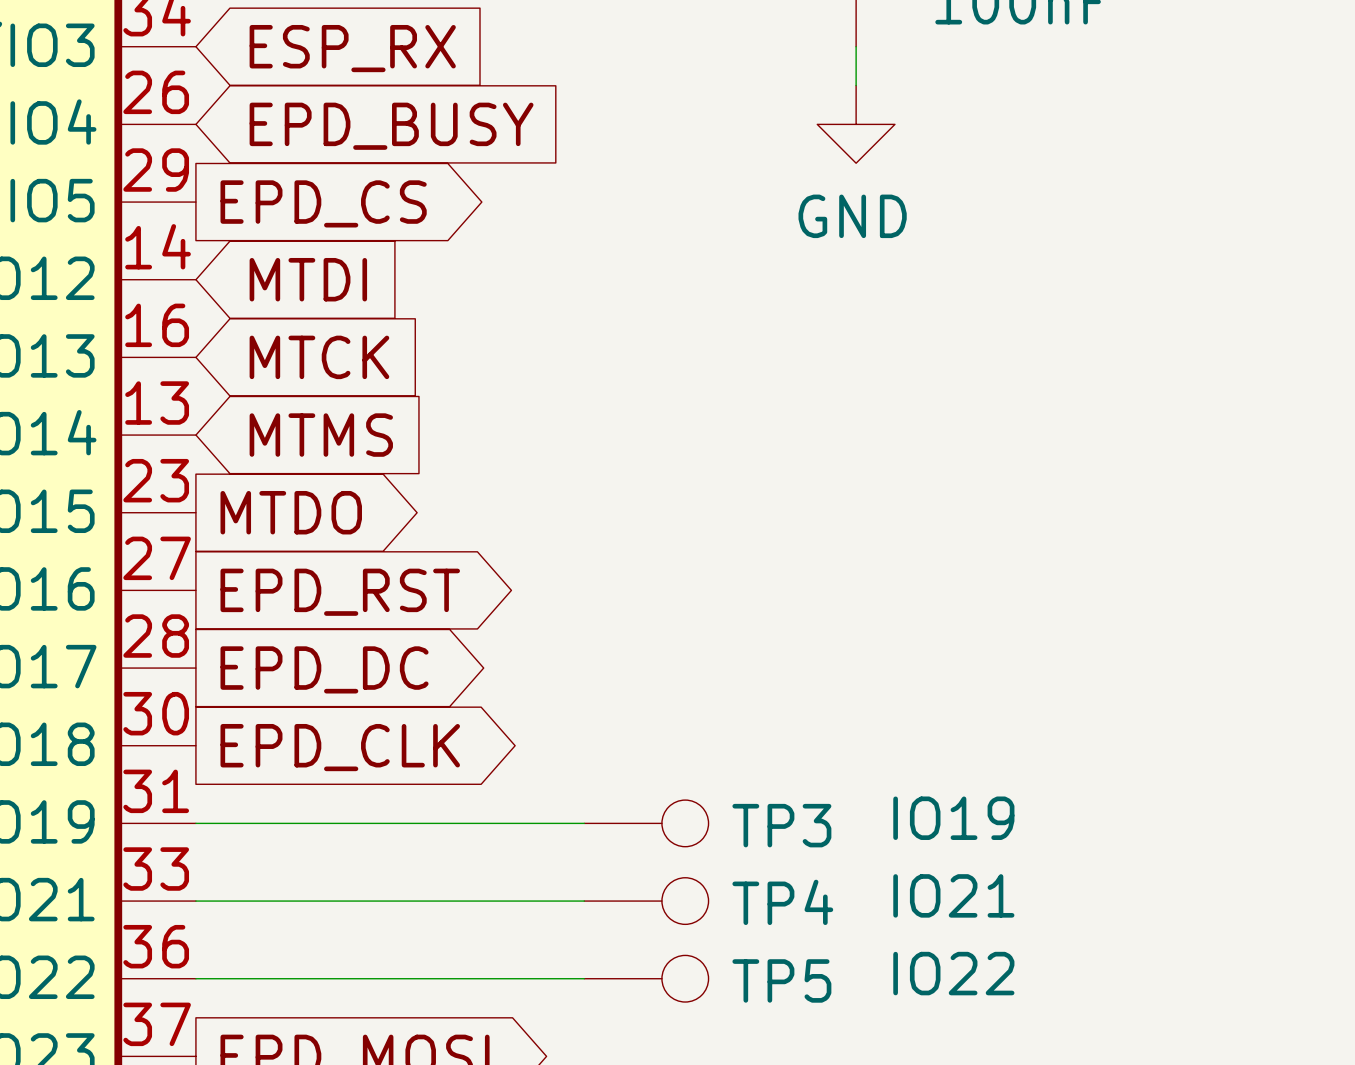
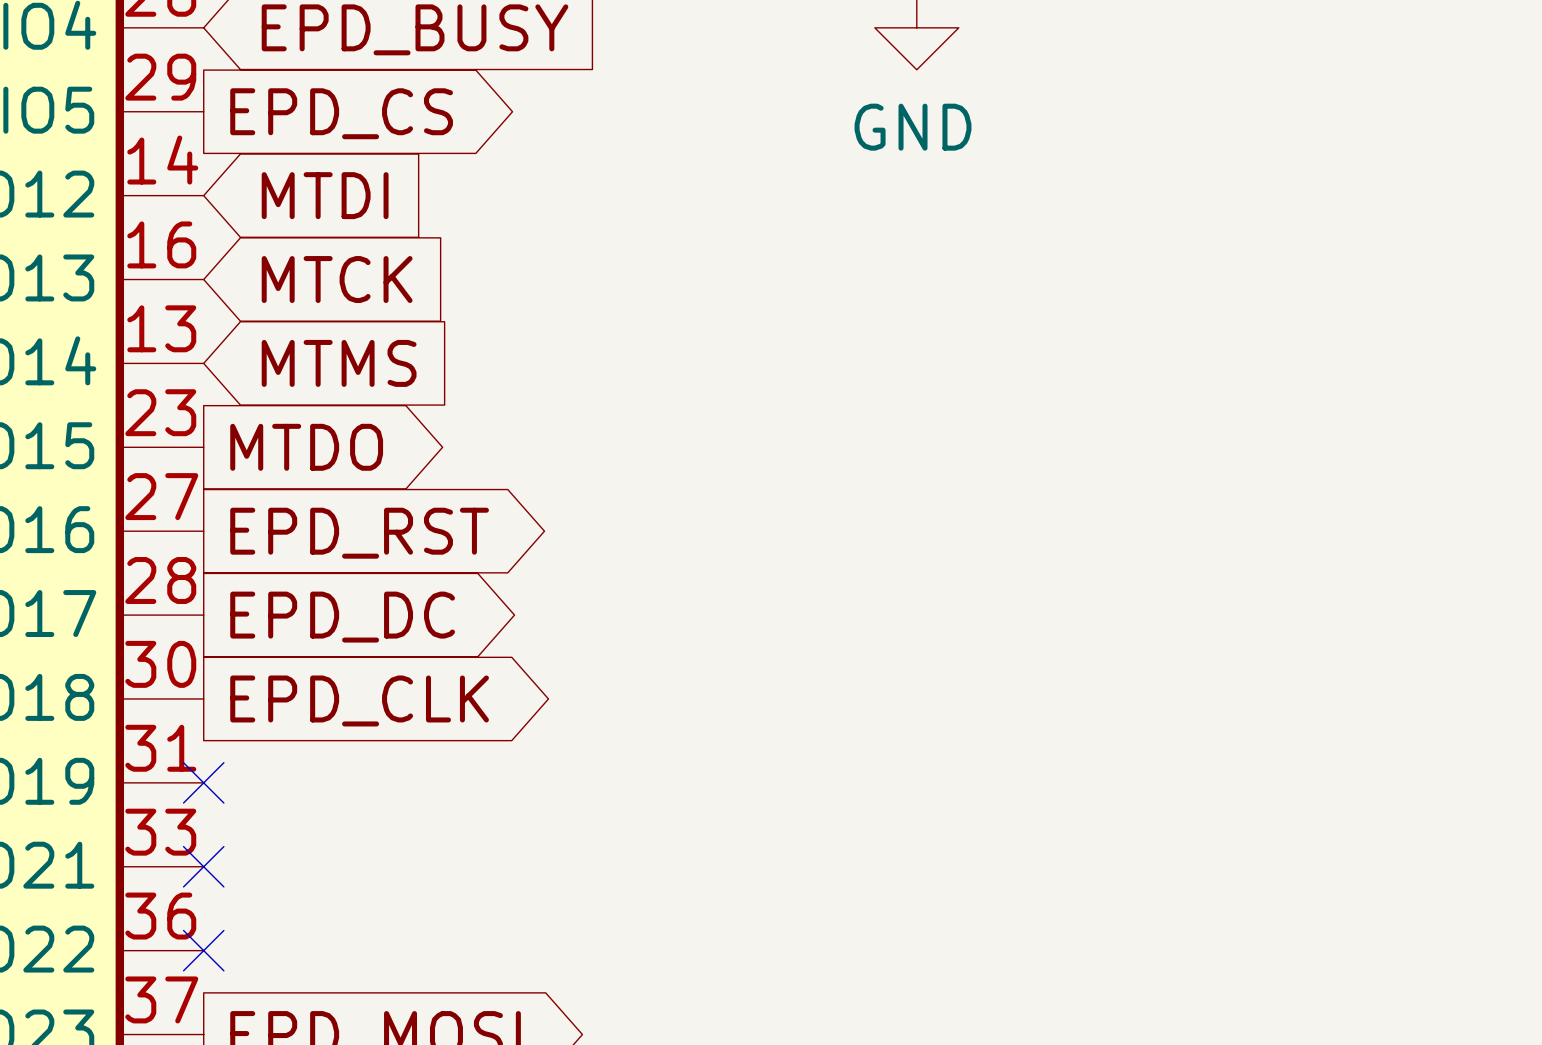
wire: (195, 823) (584, 823) -> none
no-connect mark: none -> (203, 782)
TP3: IO19 (646, 823) -> none
wire: (195, 901) (584, 901) -> none
no-connect mark: none -> (203, 866)
TP4: IO21 (646, 901) -> none
wire: (195, 978) (584, 978) -> none
no-connect mark: none -> (203, 950)
TP5: IO22 (646, 978) -> none

